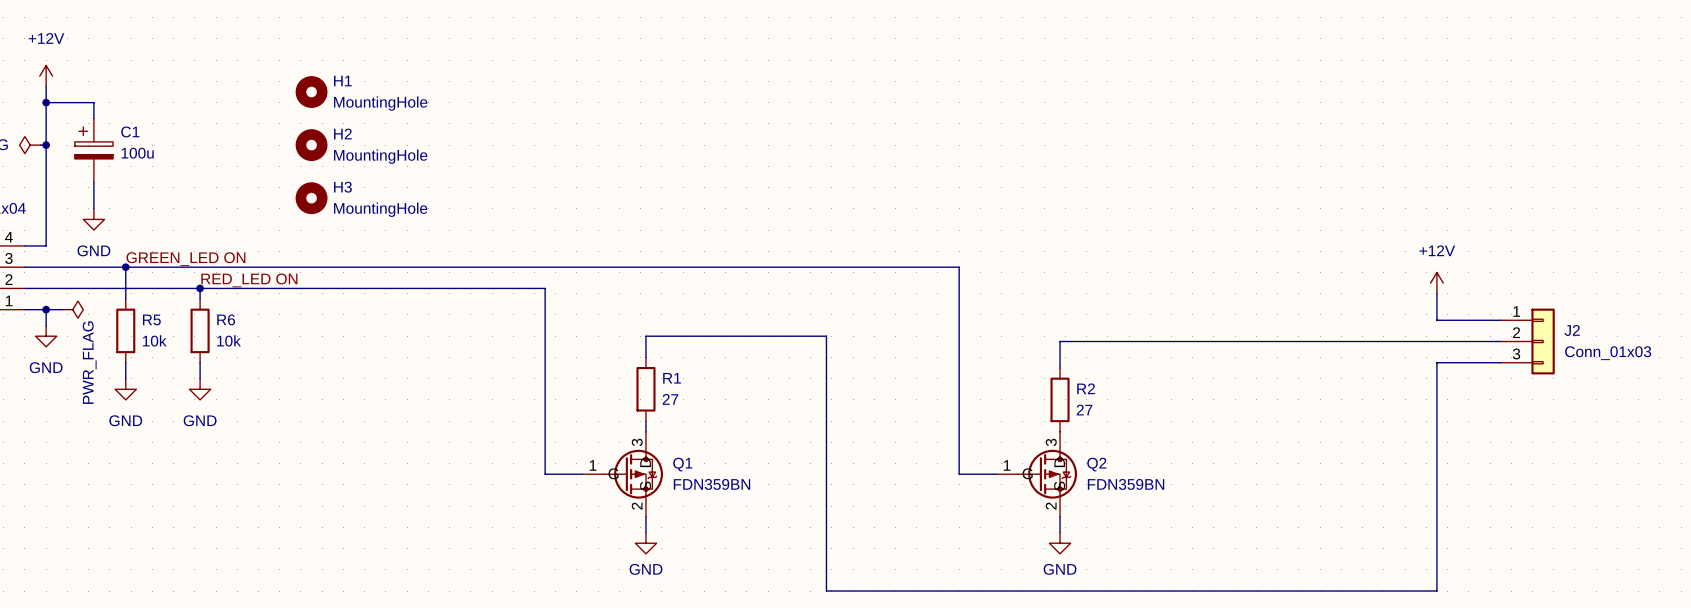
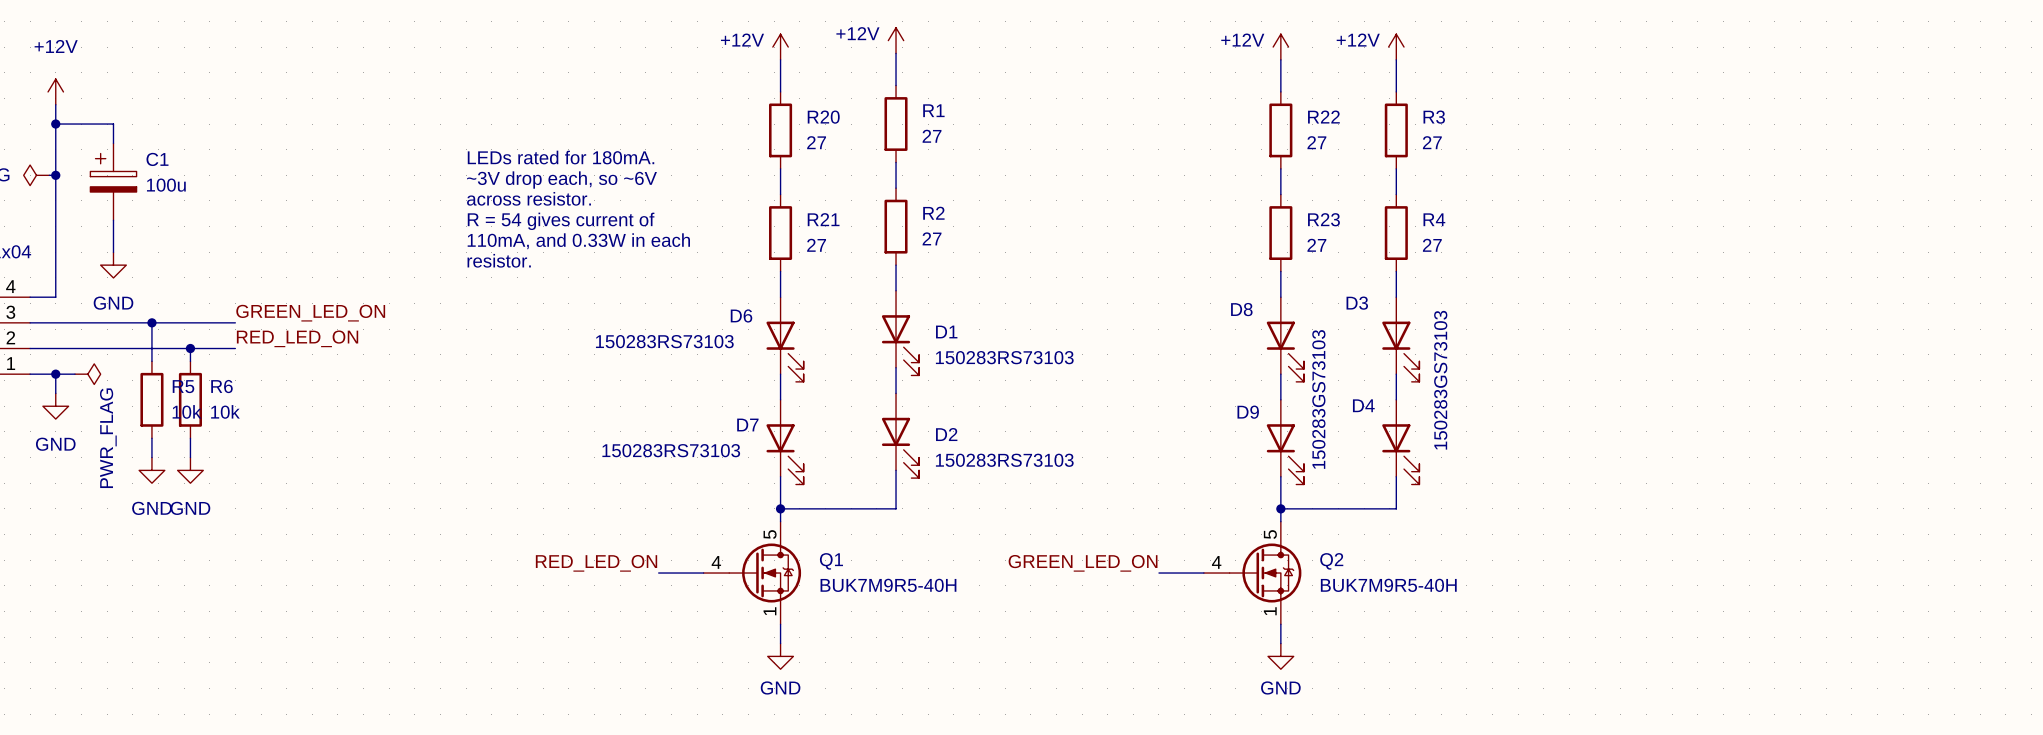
power symbol: none -> +12V (896, 40)
power symbol: none -> +12V (780, 47)
power symbol: none -> +12V (1280, 47)
power symbol: none -> +12V (1396, 47)
wire: none -> (896, 53) (896, 85)
wire: none -> (780, 59) (780, 91)
wire: none -> (1280, 59) (1280, 91)
wire: none -> (1396, 59) (1396, 91)
H1: MountingHole (311, 92) -> none
R20: none -> 27 (780, 130)
R22: none -> 27 (1280, 130)
R3: none -> 27 (1396, 130)
text: none -> LEDs rated for 180mA. (561, 157)
wire: none -> (896, 162) (896, 188)
wire: none -> (780, 168) (780, 194)
wire: none -> (1280, 168) (1280, 194)
wire: none -> (1396, 168) (1396, 194)
H2: MountingHole (311, 145) -> none
text: none -> ~3V drop each, so ~6V (562, 180)
text: none -> across resistor. (529, 198)
text: none -> R = 54 gives current of (561, 221)
R21: none -> 27 (780, 233)
R23: none -> 27 (1280, 233)
R4: none -> 27 (1396, 233)
H3: MountingHole (311, 198) -> none
text: none -> 110mA, and 0.33W in each (578, 241)
text: none -> resistor. (499, 260)
wire: none -> (896, 265) (896, 290)
wire: none -> (780, 271) (780, 297)
wire: none -> (1280, 271) (1280, 297)
wire: none -> (1396, 271) (1396, 297)
label: GREEN_LED ON (185, 259) -> GREEN_LED_ON (310, 313)
wire: (194, 267) (959, 267) (959, 474) -> none
D1: none -> 150283RS73103 (900, 333)
label: RED_LED ON (249, 280) -> RED_LED_ON (297, 338)
D6: none -> 150283RS73103 (785, 339)
D8: none -> (1285, 339)
D3: none -> 150283GS73103 (1400, 339)
power symbol: +12V (1436, 283) -> none
wire: (194, 288) (545, 288) (545, 474) -> none
wire: (200, 288) (200, 299) -> (190, 348) (190, 361)
junction position: (200, 288) -> (190, 348)
wire: (1436, 293) (1436, 320) (1500, 320) -> none
wire: none -> (896, 367) (896, 393)
wire: none -> (780, 374) (780, 399)
wire: none -> (1280, 374) (1280, 399)
wire: none -> (1396, 374) (1396, 399)
R6 position: (200, 330) -> (190, 399)
wire: (1500, 341) (1060, 341) (1060, 368) -> none
J2: Conn_01x03 (1527, 341) -> none
wire: (645, 357) (645, 336) (826, 336) (826, 591) (1436, 591) (1436, 362) (1500, 362) -> none
D2: none -> 150283RS73103 (900, 435)
wire: (200, 362) (200, 378) -> (190, 438) (190, 457)
D7: none -> 150283RS73103 (785, 442)
D9: none -> 150283GS73103 (1285, 442)
D4: none -> (1400, 442)
R1 name position: R1 (672, 378) -> R1 (933, 110)
R2 name position: R2 (1086, 388) -> R2 (933, 213)
power symbol position: GND (200, 389) -> GND (190, 470)
R1 position: (645, 389) -> (896, 124)
wire: none -> (896, 470) (896, 508) (780, 508) (780, 476)
wire: none -> (1280, 476) (1280, 521)
wire: none -> (1396, 476) (1396, 508) (1280, 508)
R1 value position: 27 (670, 399) -> 27 (932, 136)
R2 position: (1060, 399) -> (896, 226)
R2 value position: 27 (1084, 410) -> 27 (932, 238)
junction: none -> (780, 508)
junction: none -> (1280, 508)
Q1 symbol: [582, 431, 663, 517] -> [703, 521, 802, 625]
Q2 symbol: [996, 431, 1078, 517] -> [1203, 521, 1302, 625]
label: none -> RED_LED_ON (596, 563)
label: none -> GREEN_LED_ON (1083, 563)
Q1 value: FDN359BN (711, 484) -> BUK7M9R5-40H (888, 585)
Q2 value: FDN359BN (1126, 484) -> BUK7M9R5-40H (1388, 585)

